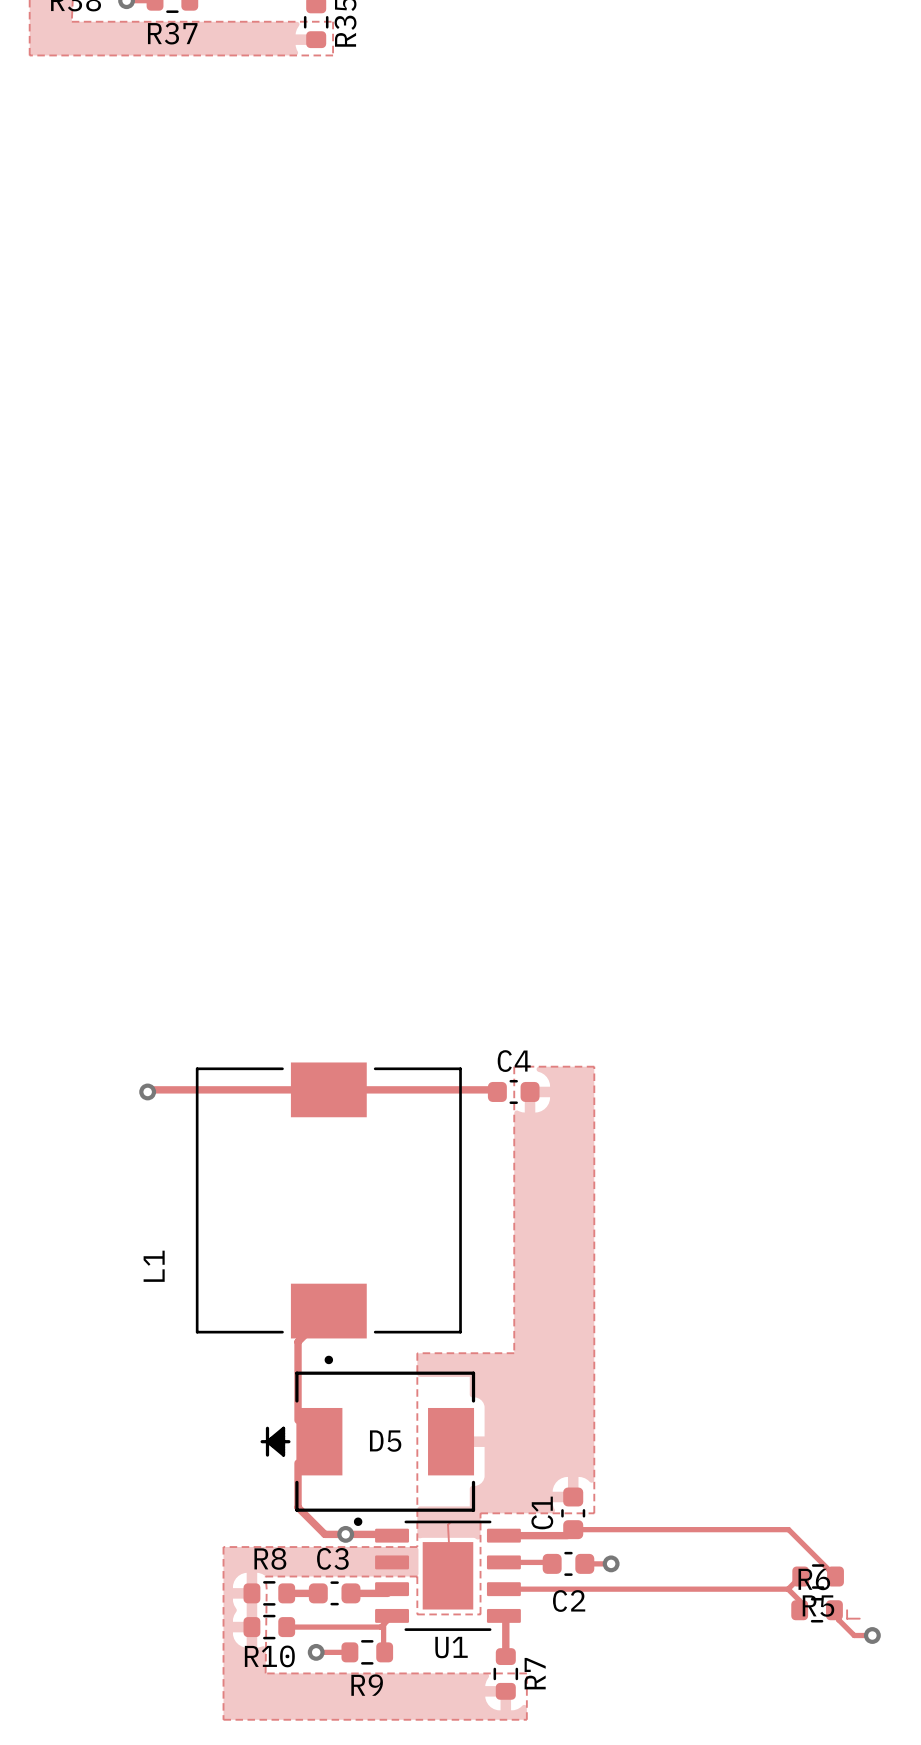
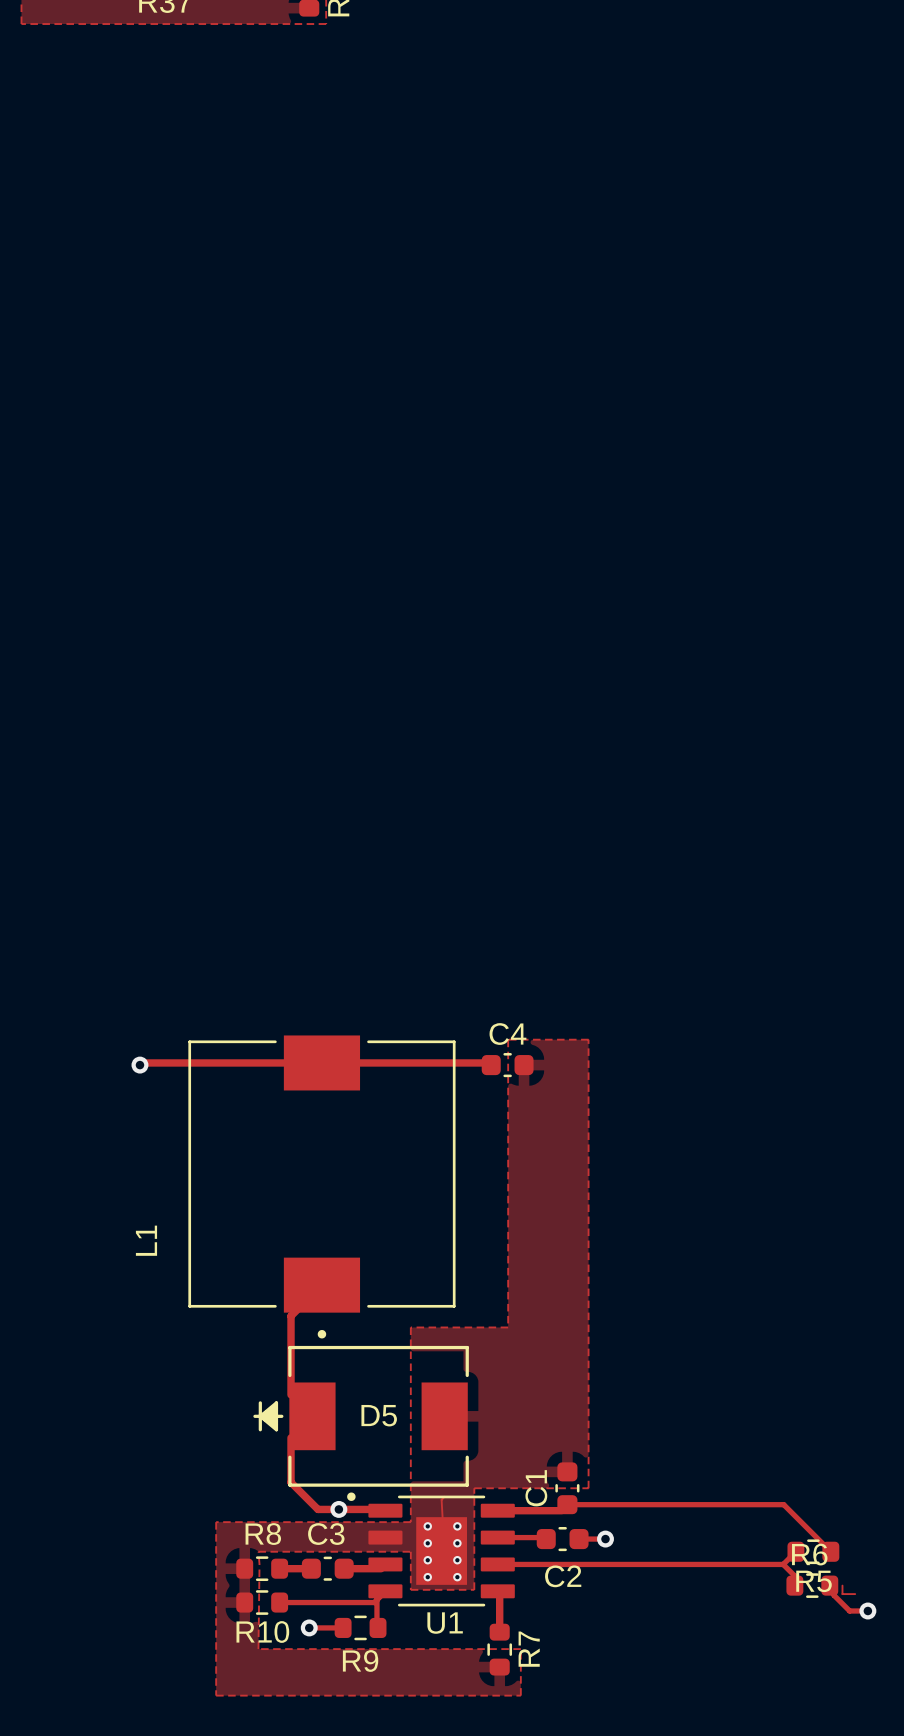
via: none -> (427, 1526)
via: none -> (457, 1526)
via: none -> (427, 1543)
via: none -> (457, 1543)
via: none -> (427, 1560)
via: none -> (457, 1560)
via: none -> (427, 1577)
via: none -> (457, 1577)

